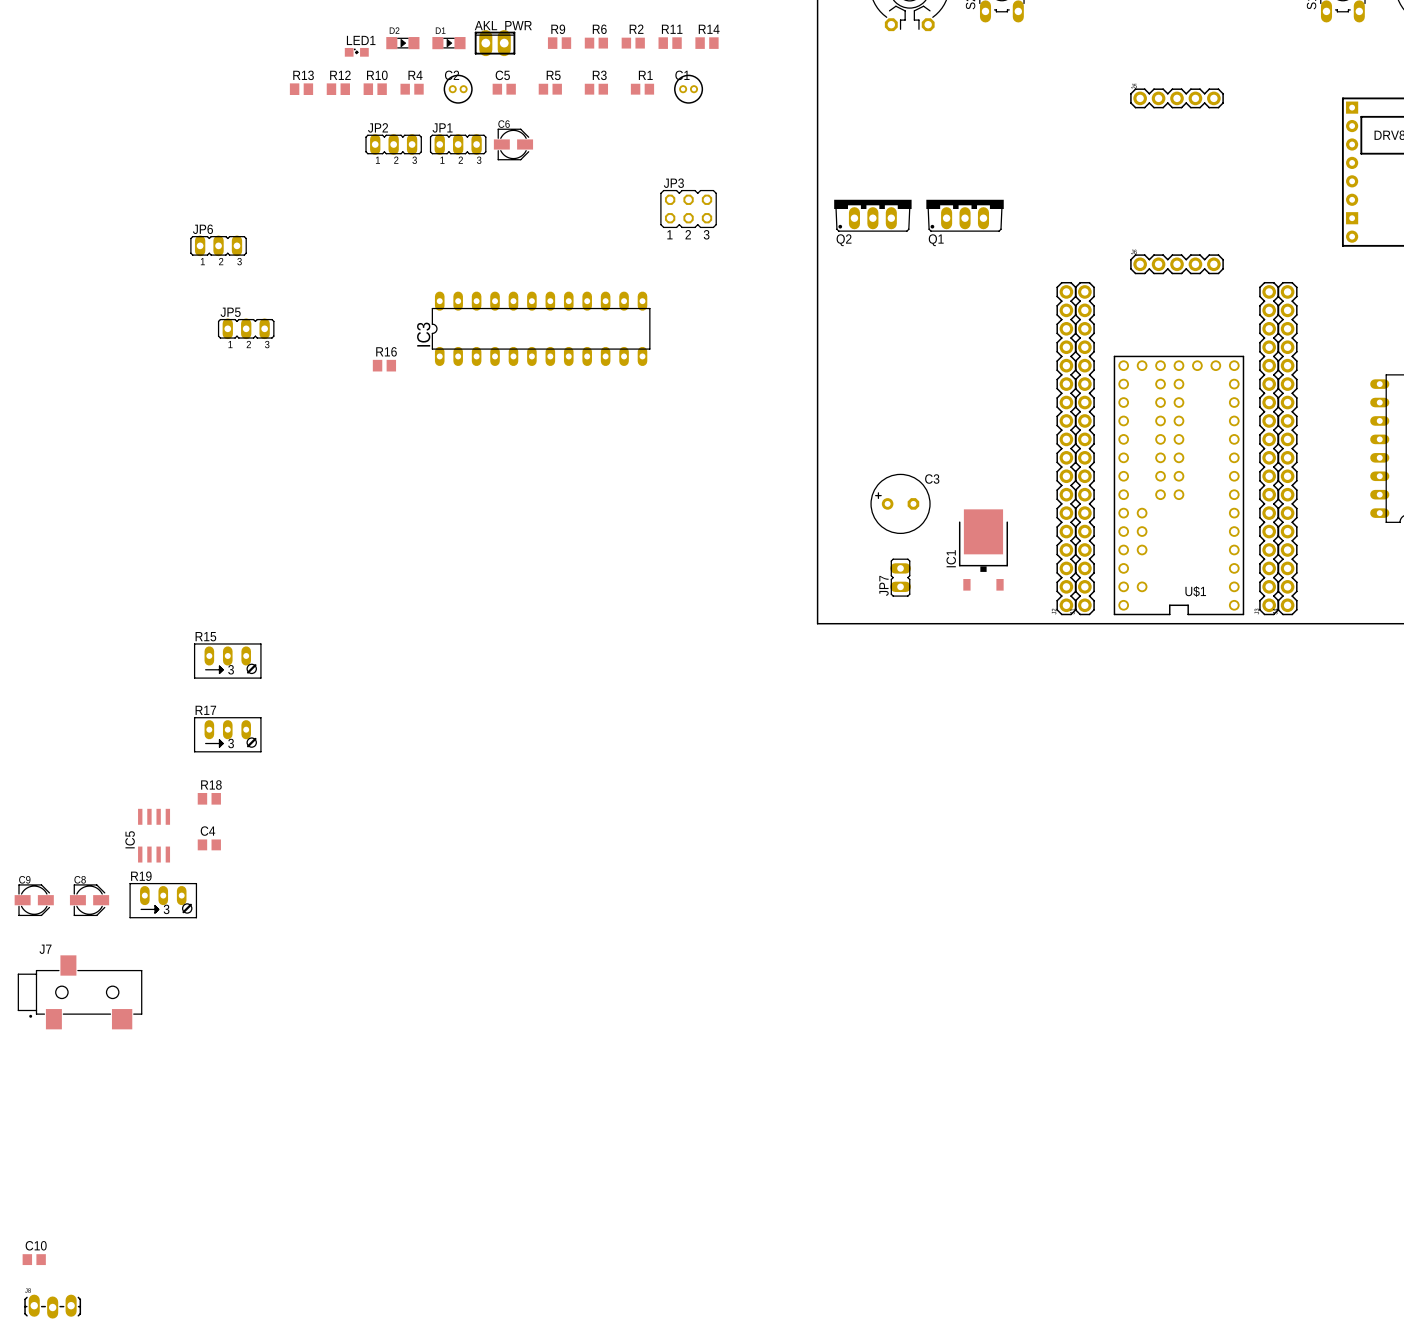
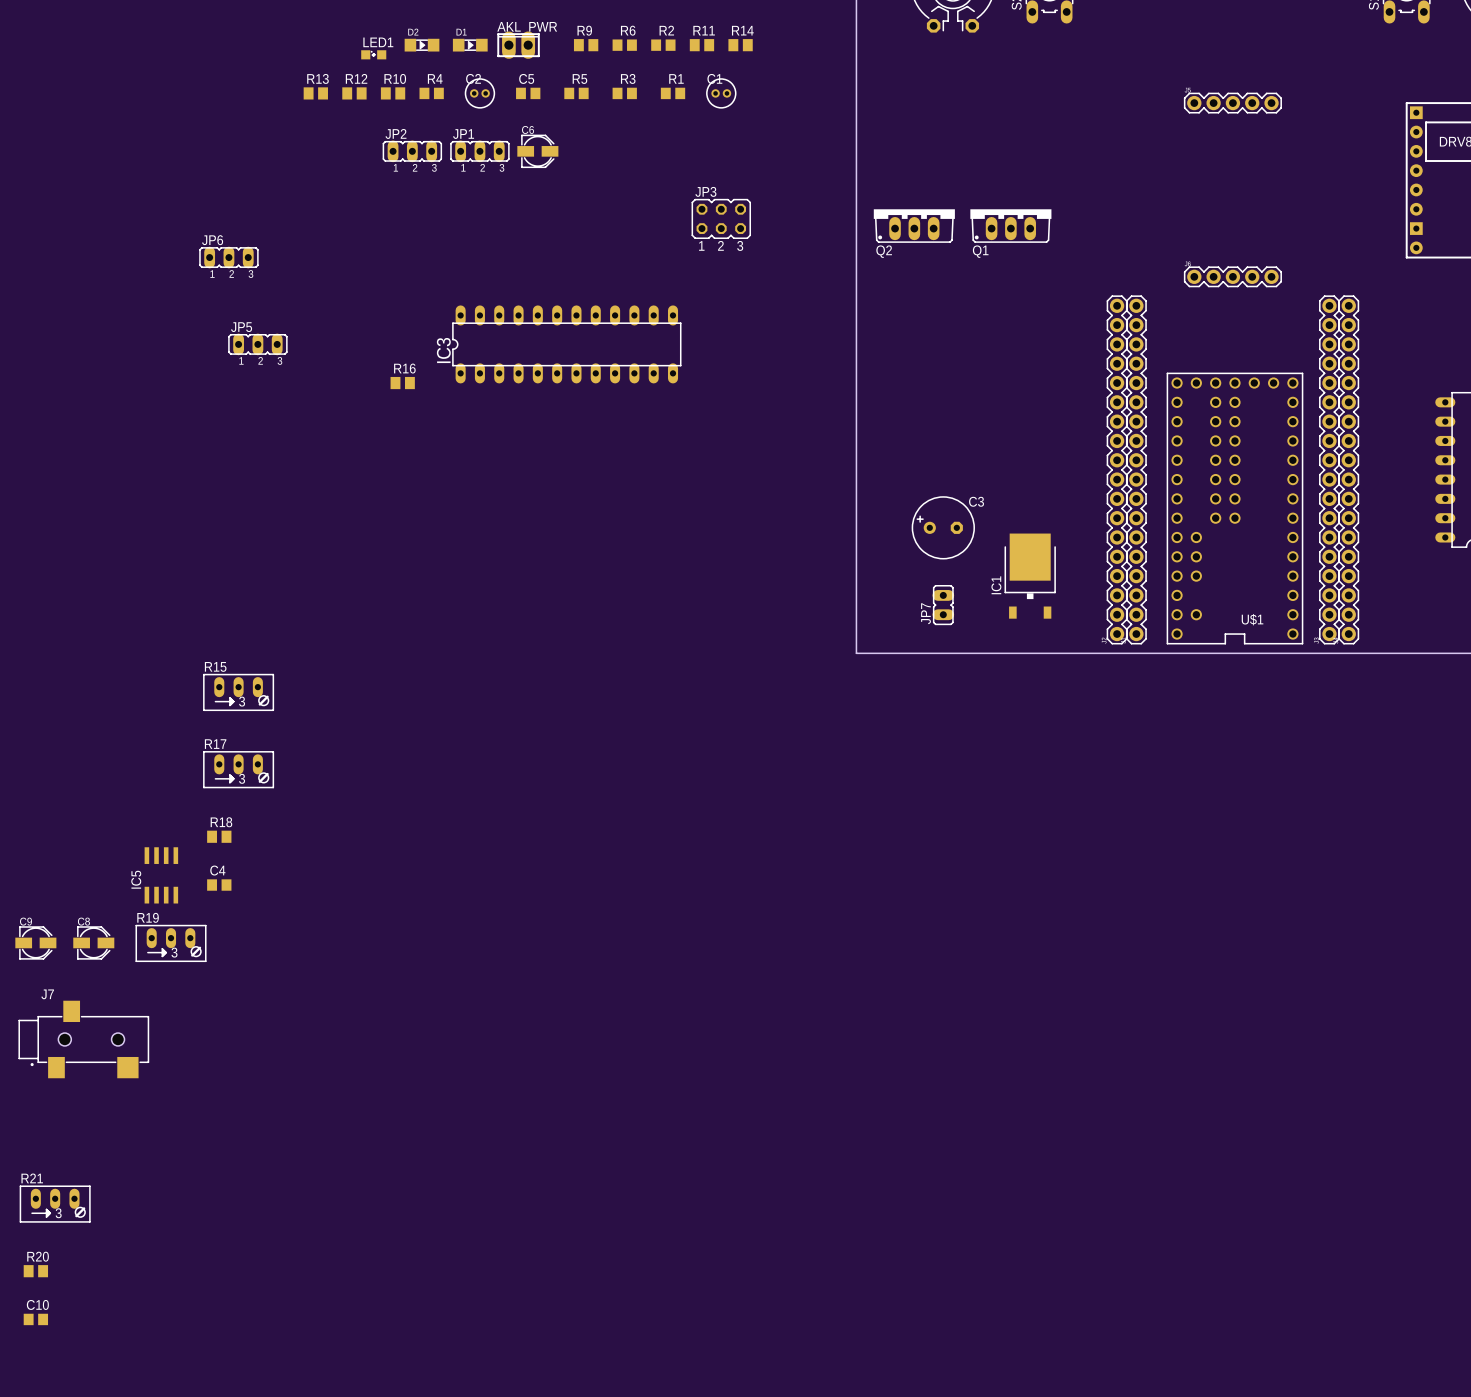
R21: none -> (55, 1204)
R20: none -> (35, 1271)
part: (52, 1306) -> none

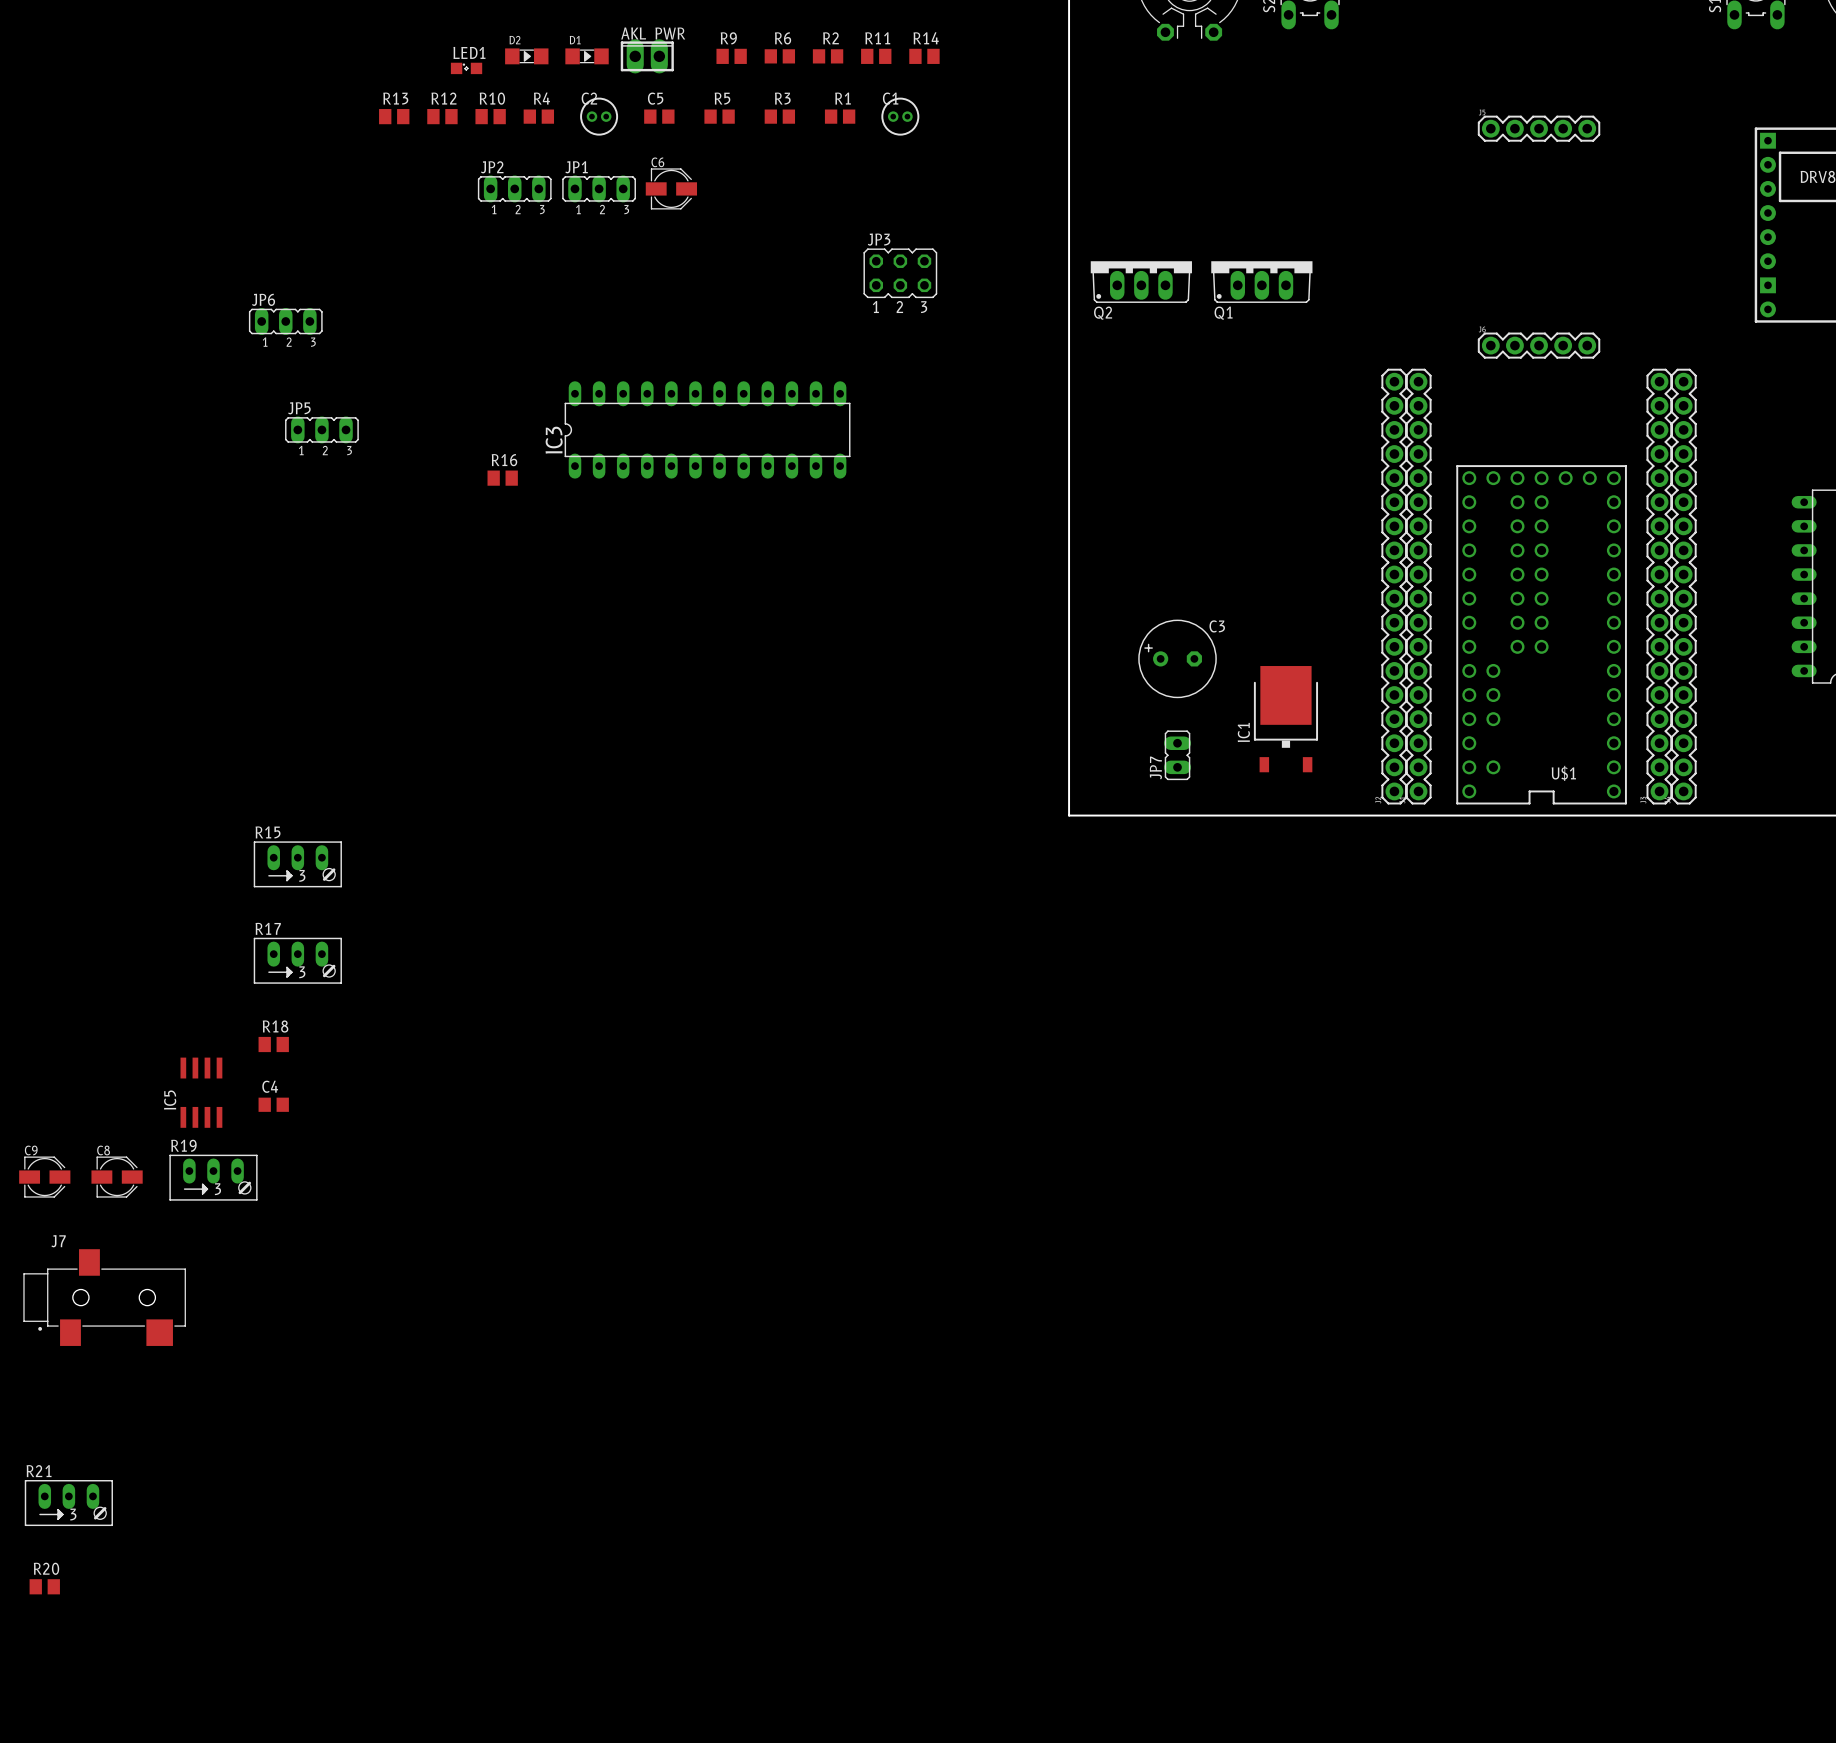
C10: (35, 1319) -> none

